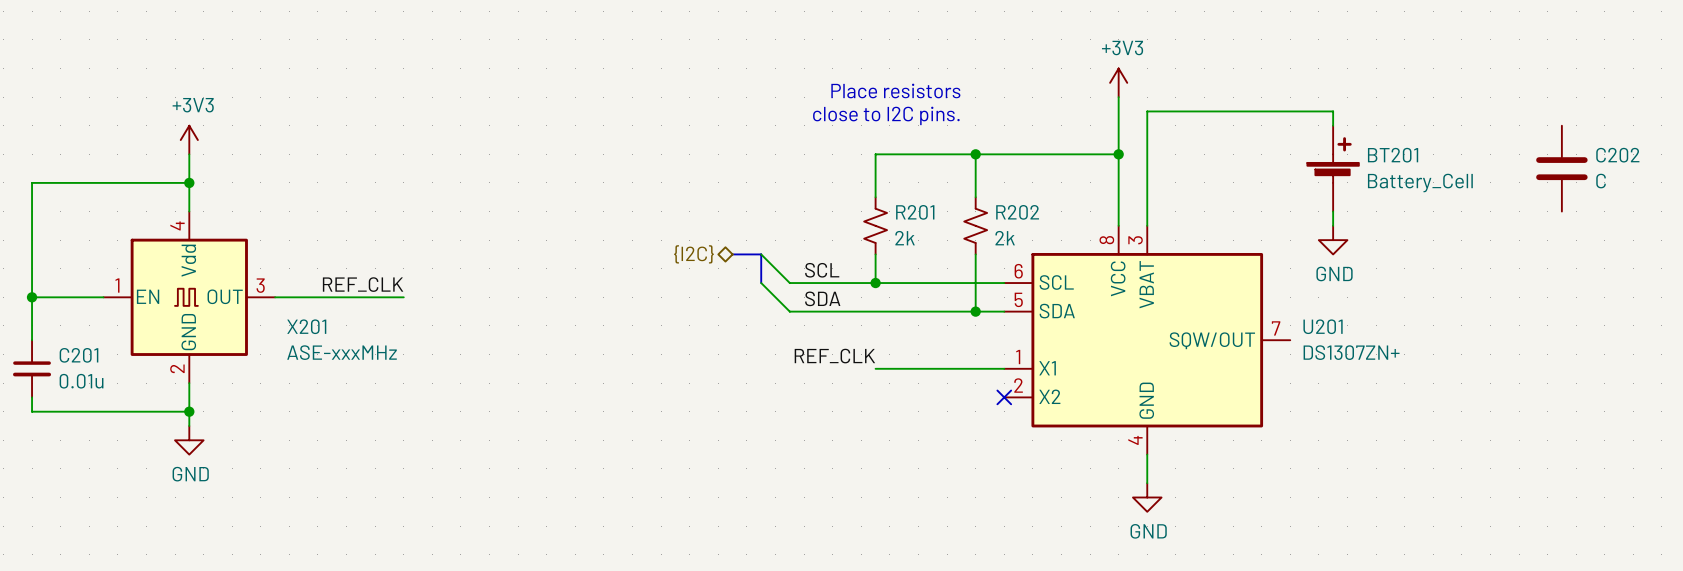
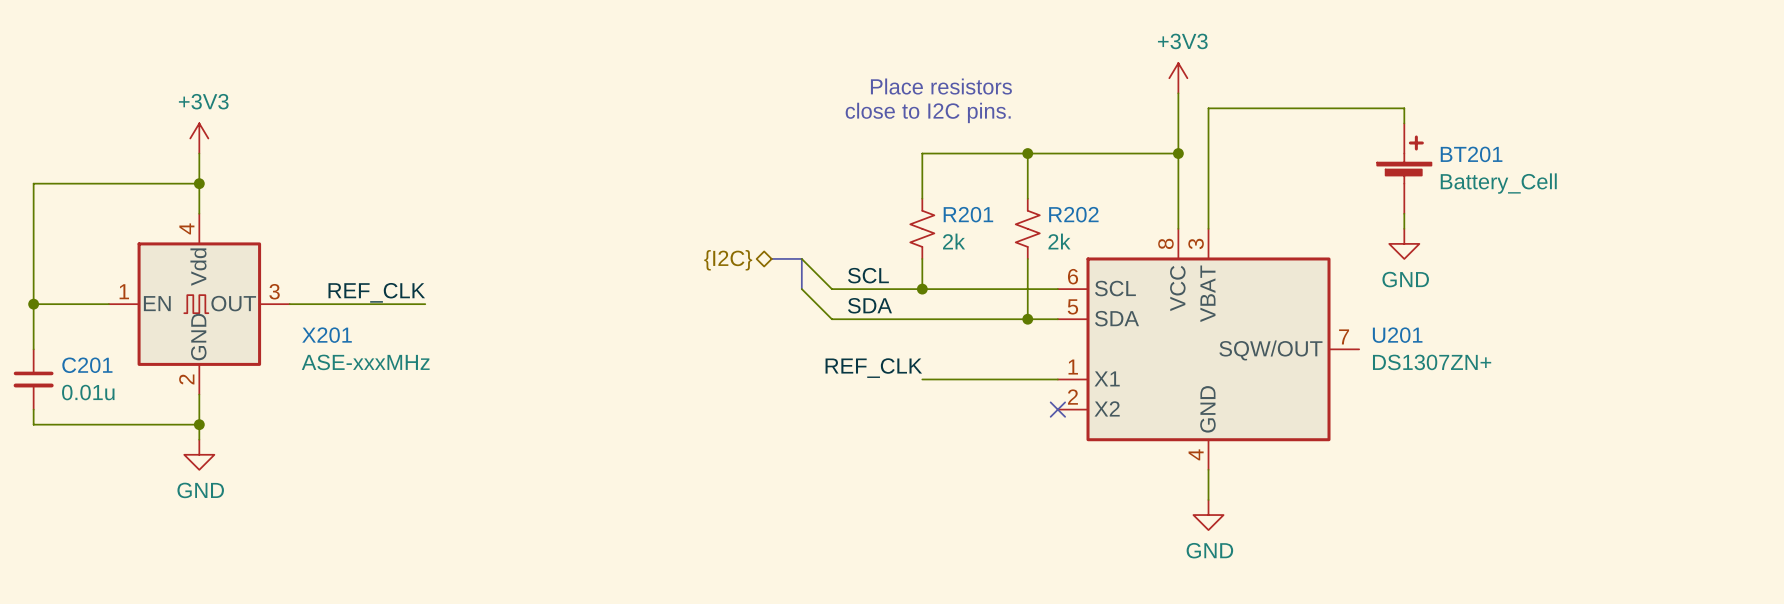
C202: C (1561, 168) -> none

